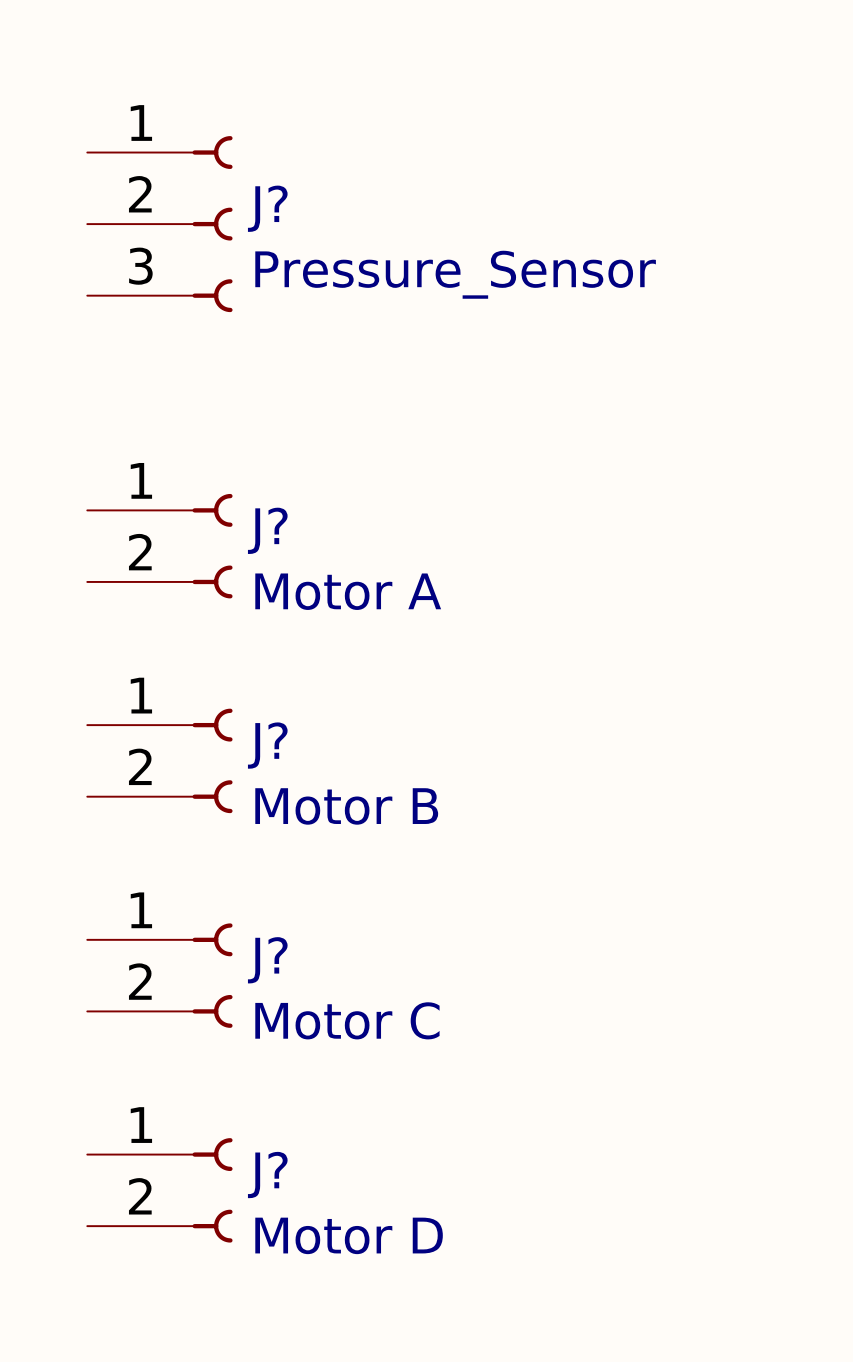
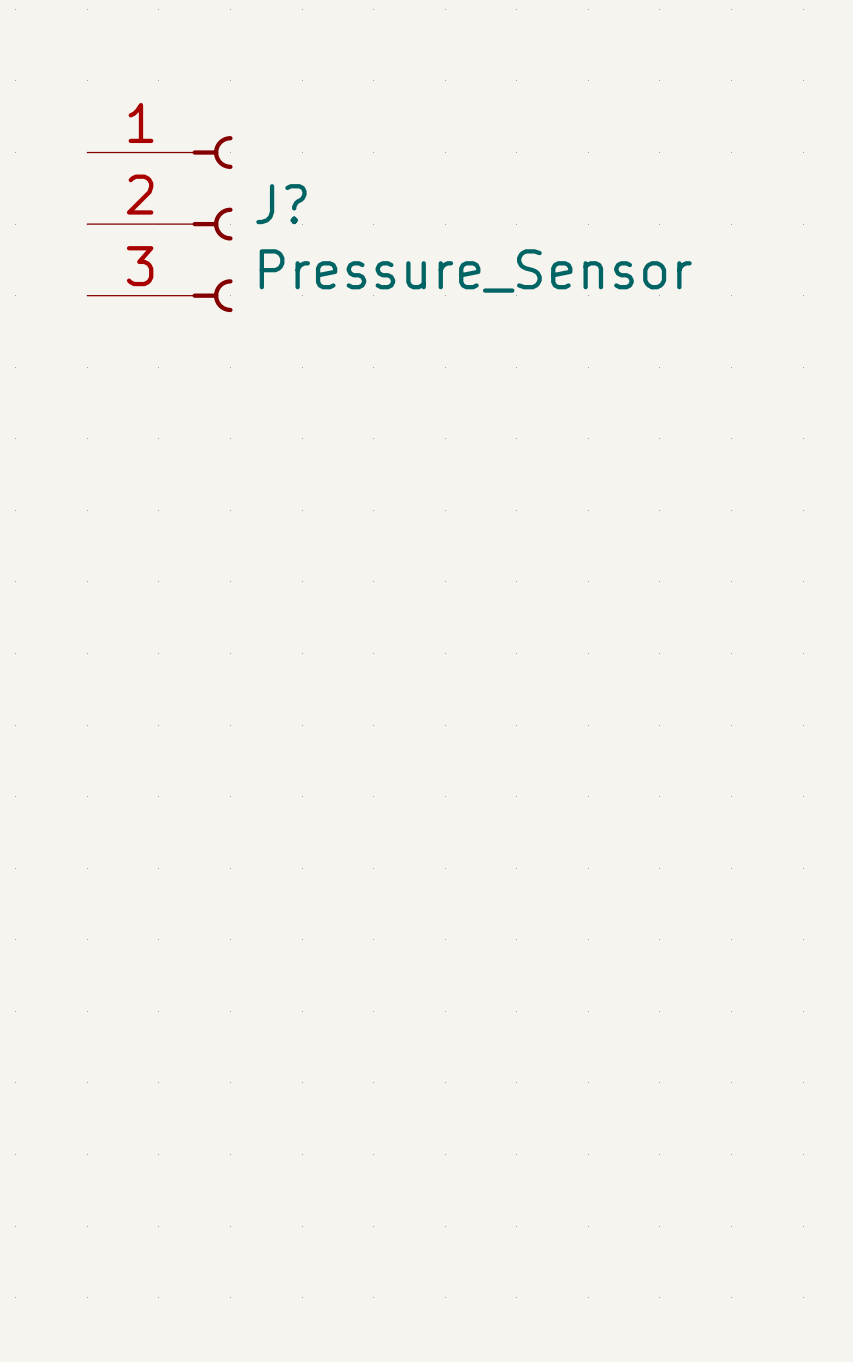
J?: Motor A (159, 546) -> none
J?: Motor B (159, 760) -> none
J?: Motor C (159, 975) -> none
J?: Motor D (159, 1190) -> none

